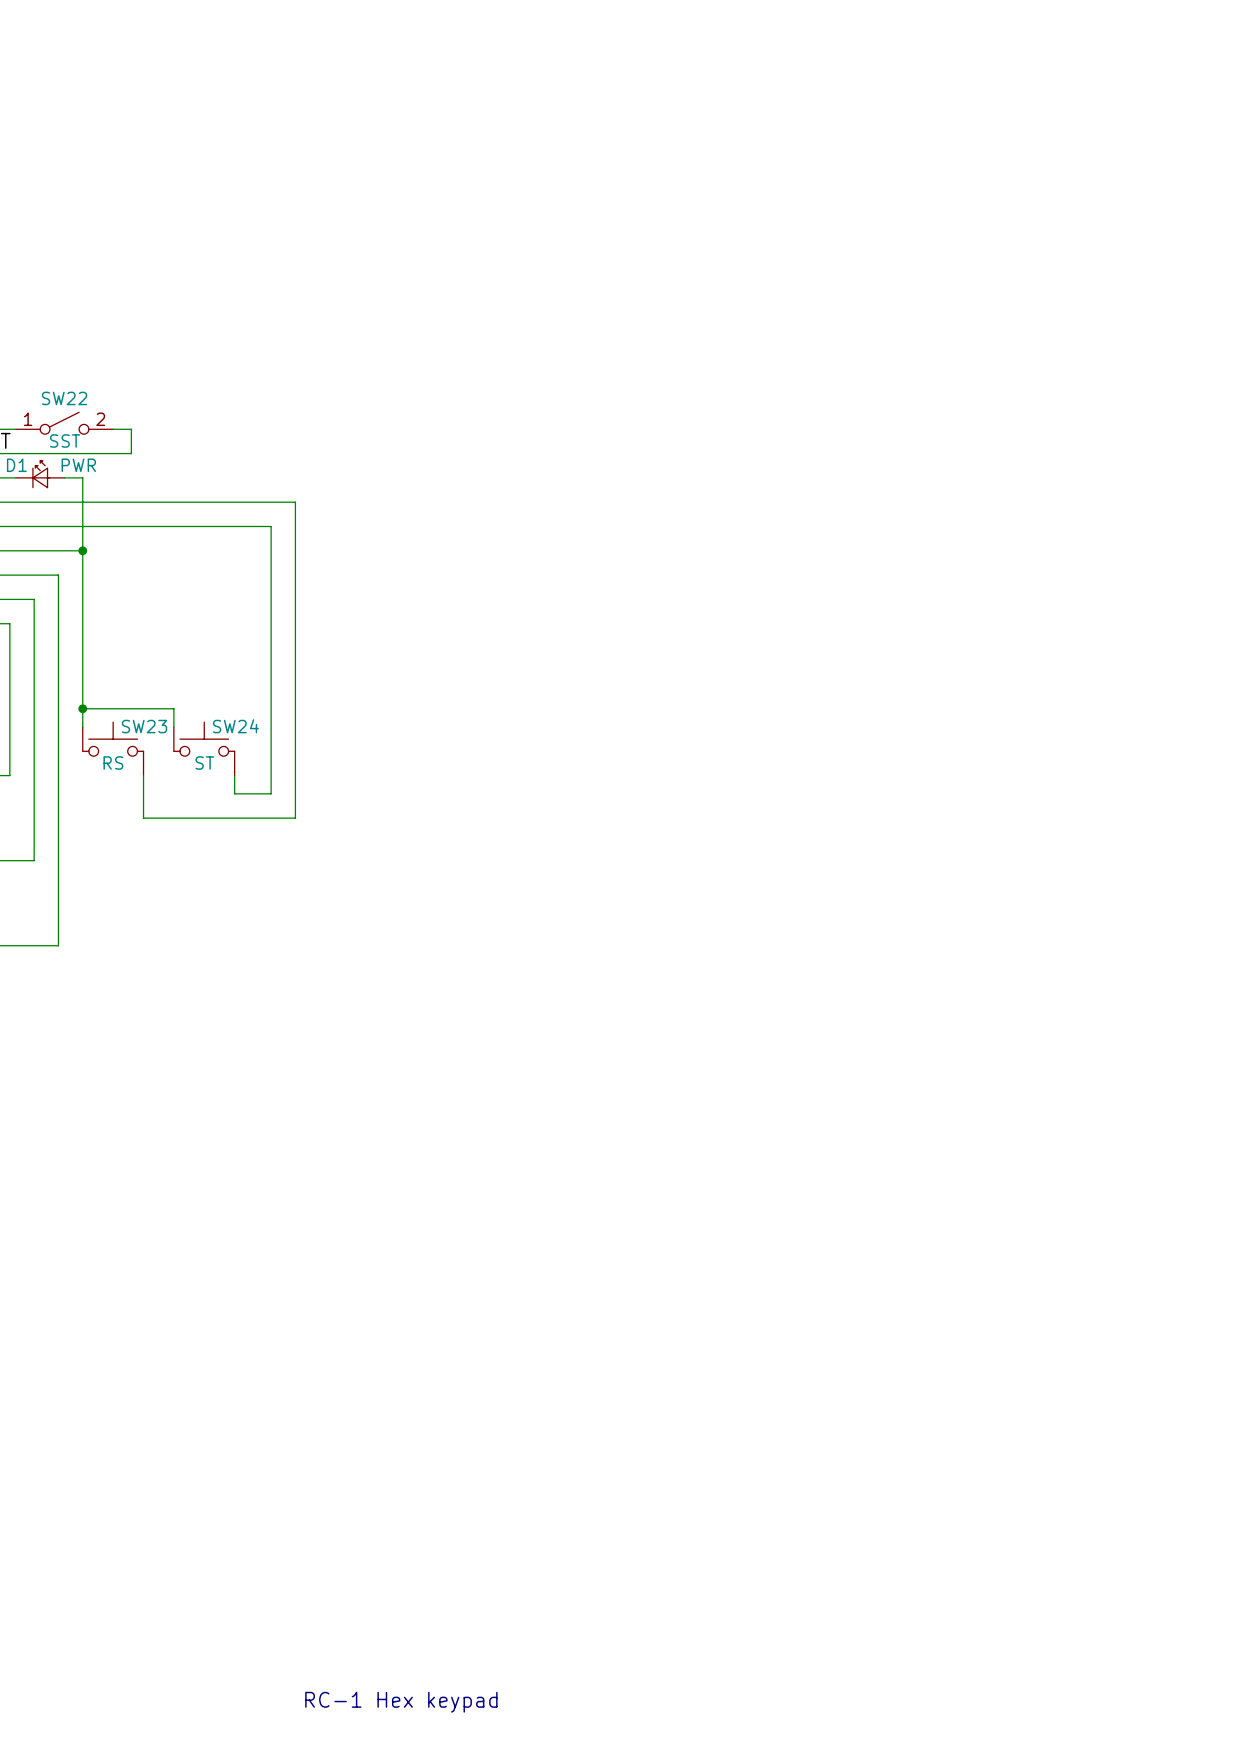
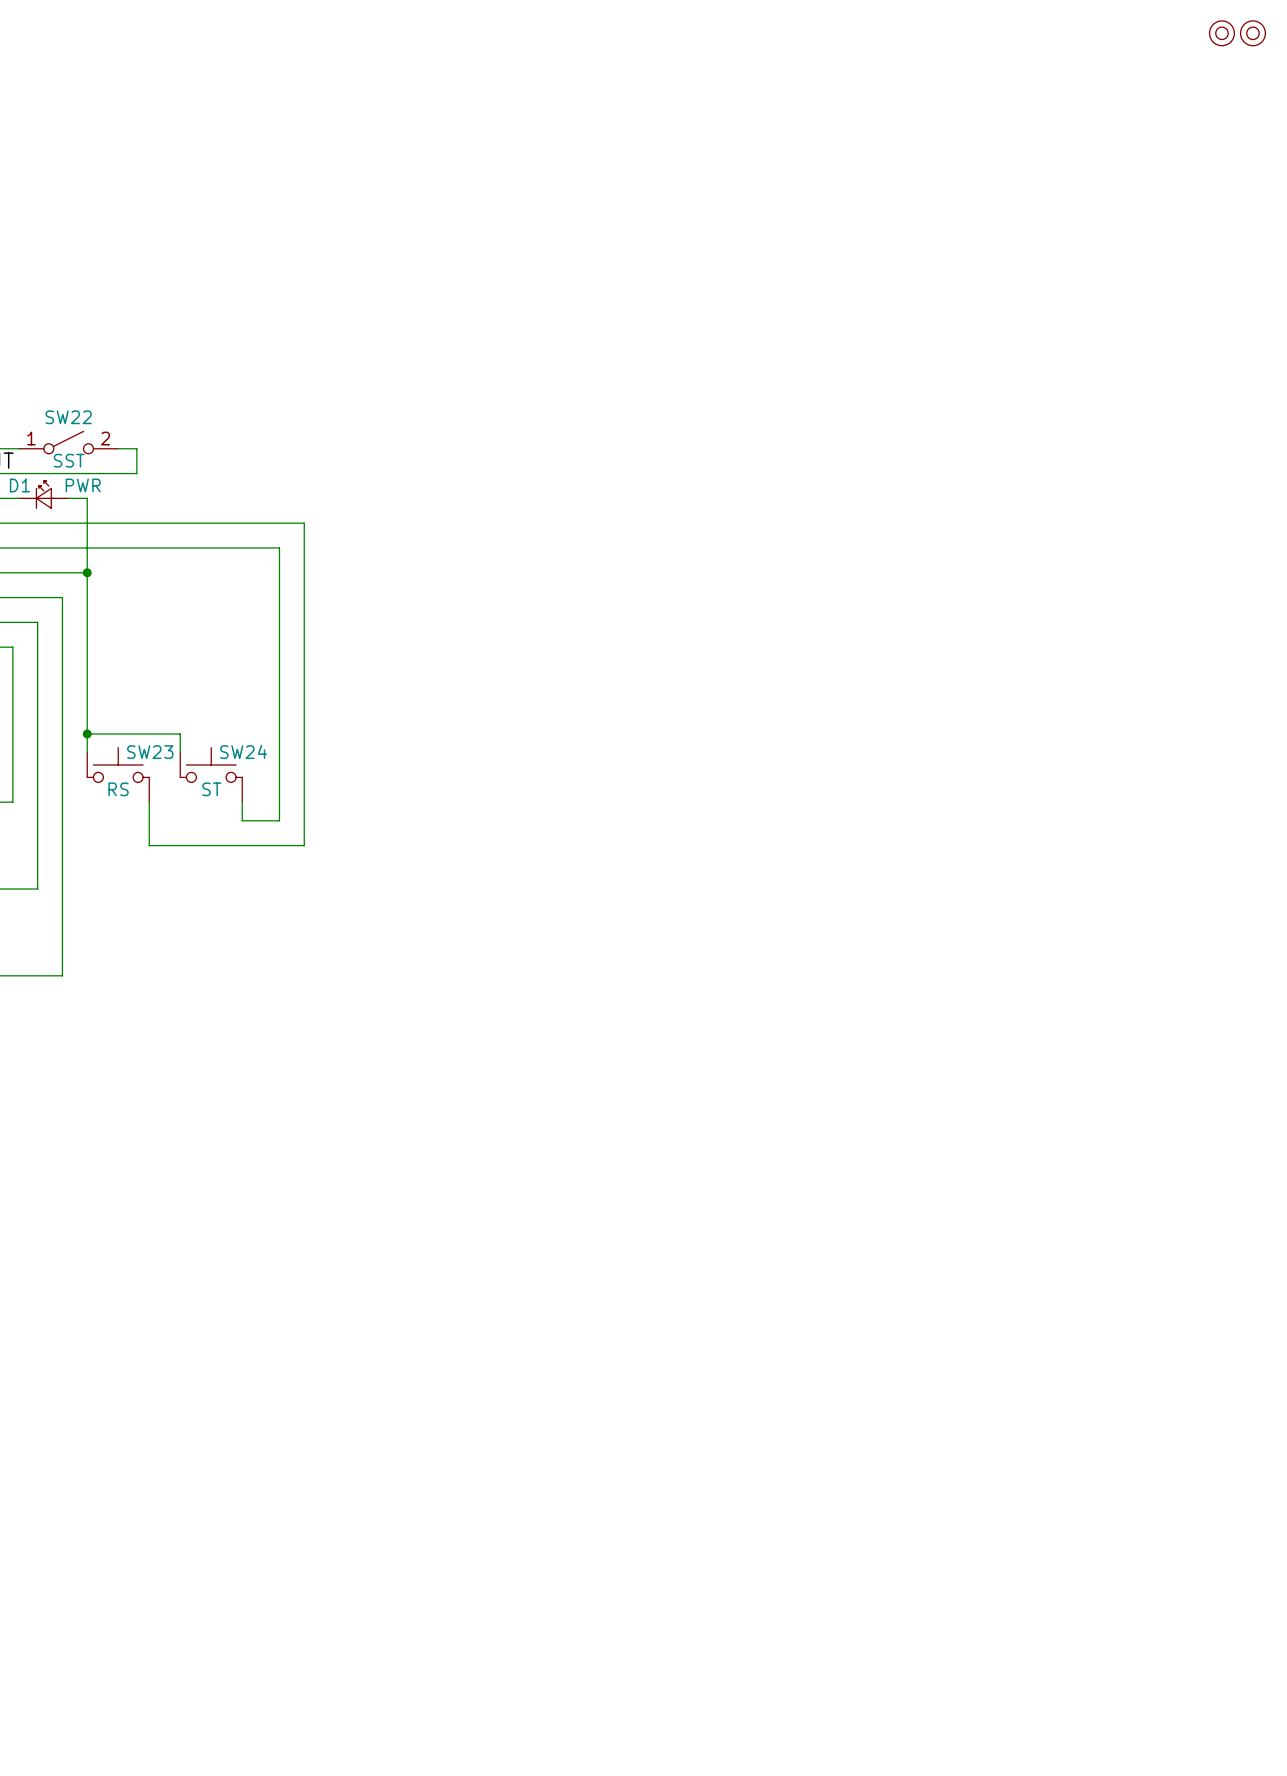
part: none -> (1221, 33)
part: none -> (1252, 33)
text: RC-1 Hex keypad (401, 1702) -> none

